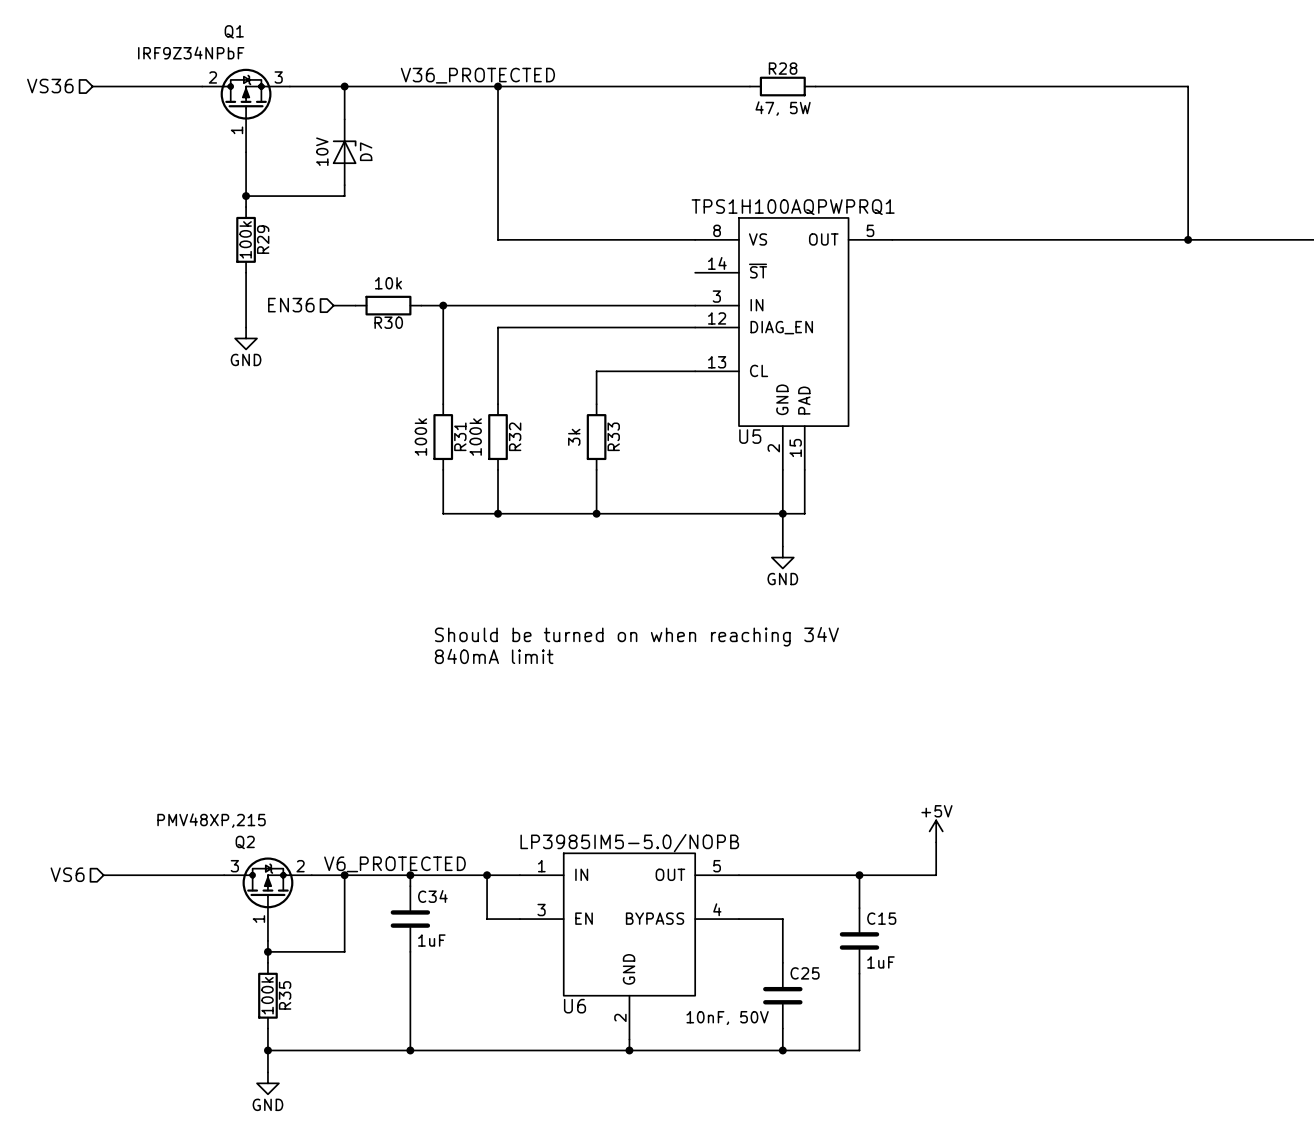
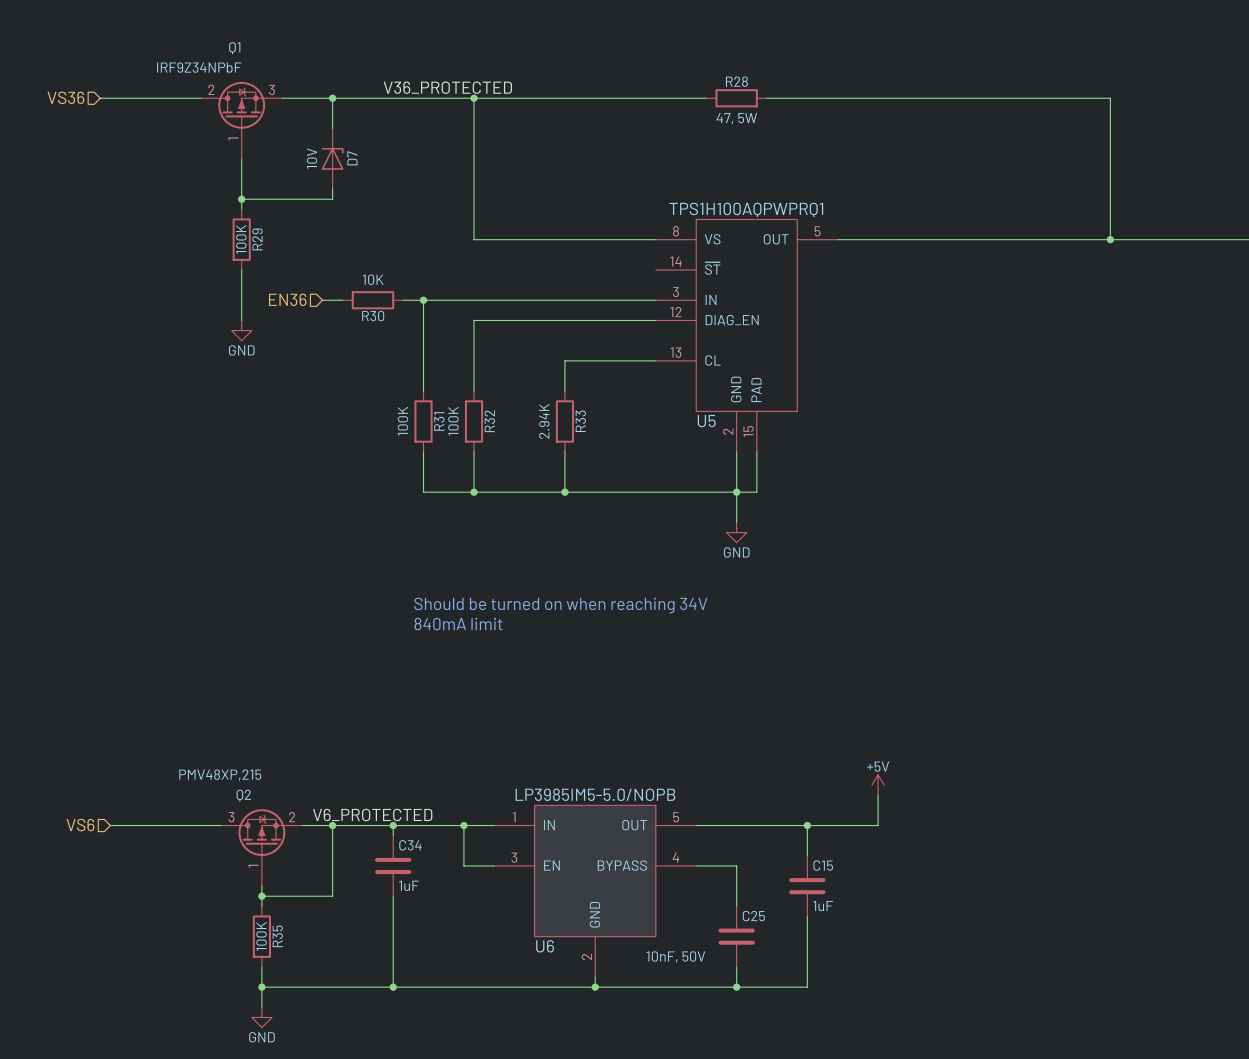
R29 value: 100k (245, 239) -> 100K (241, 239)
R30 value: 10k (388, 283) -> 10K (373, 279)
R31 value: 100k (420, 437) -> 100K (402, 421)
R32 value: 100k (475, 437) -> 100K (453, 421)
R33 value: 3k (574, 437) -> 2.94K (544, 421)
R35 value: 100k (267, 995) -> 100K (261, 936)

